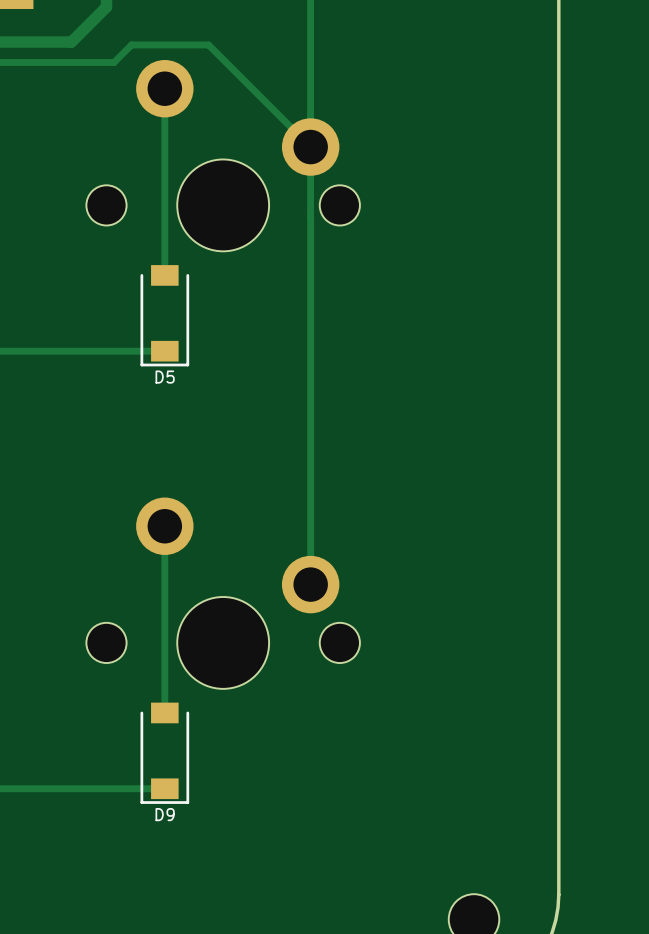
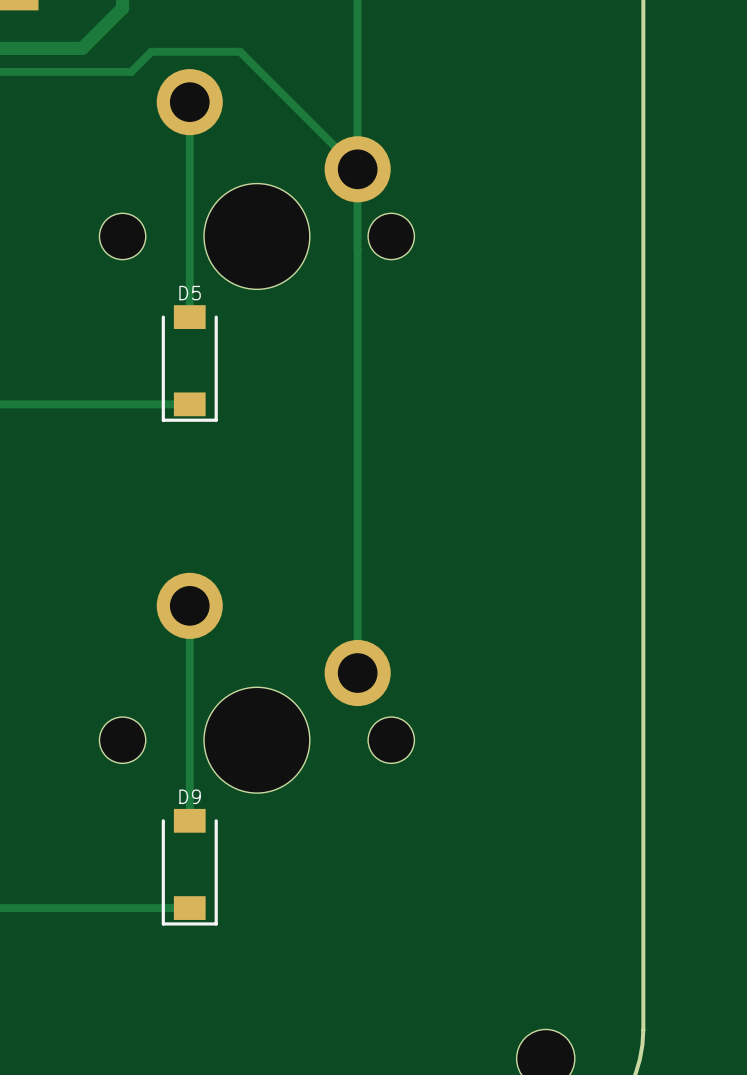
D5 name position: D5 (165, 377) -> D5 (190, 293)
D9 name position: D9 (165, 814) -> D9 (190, 796)

